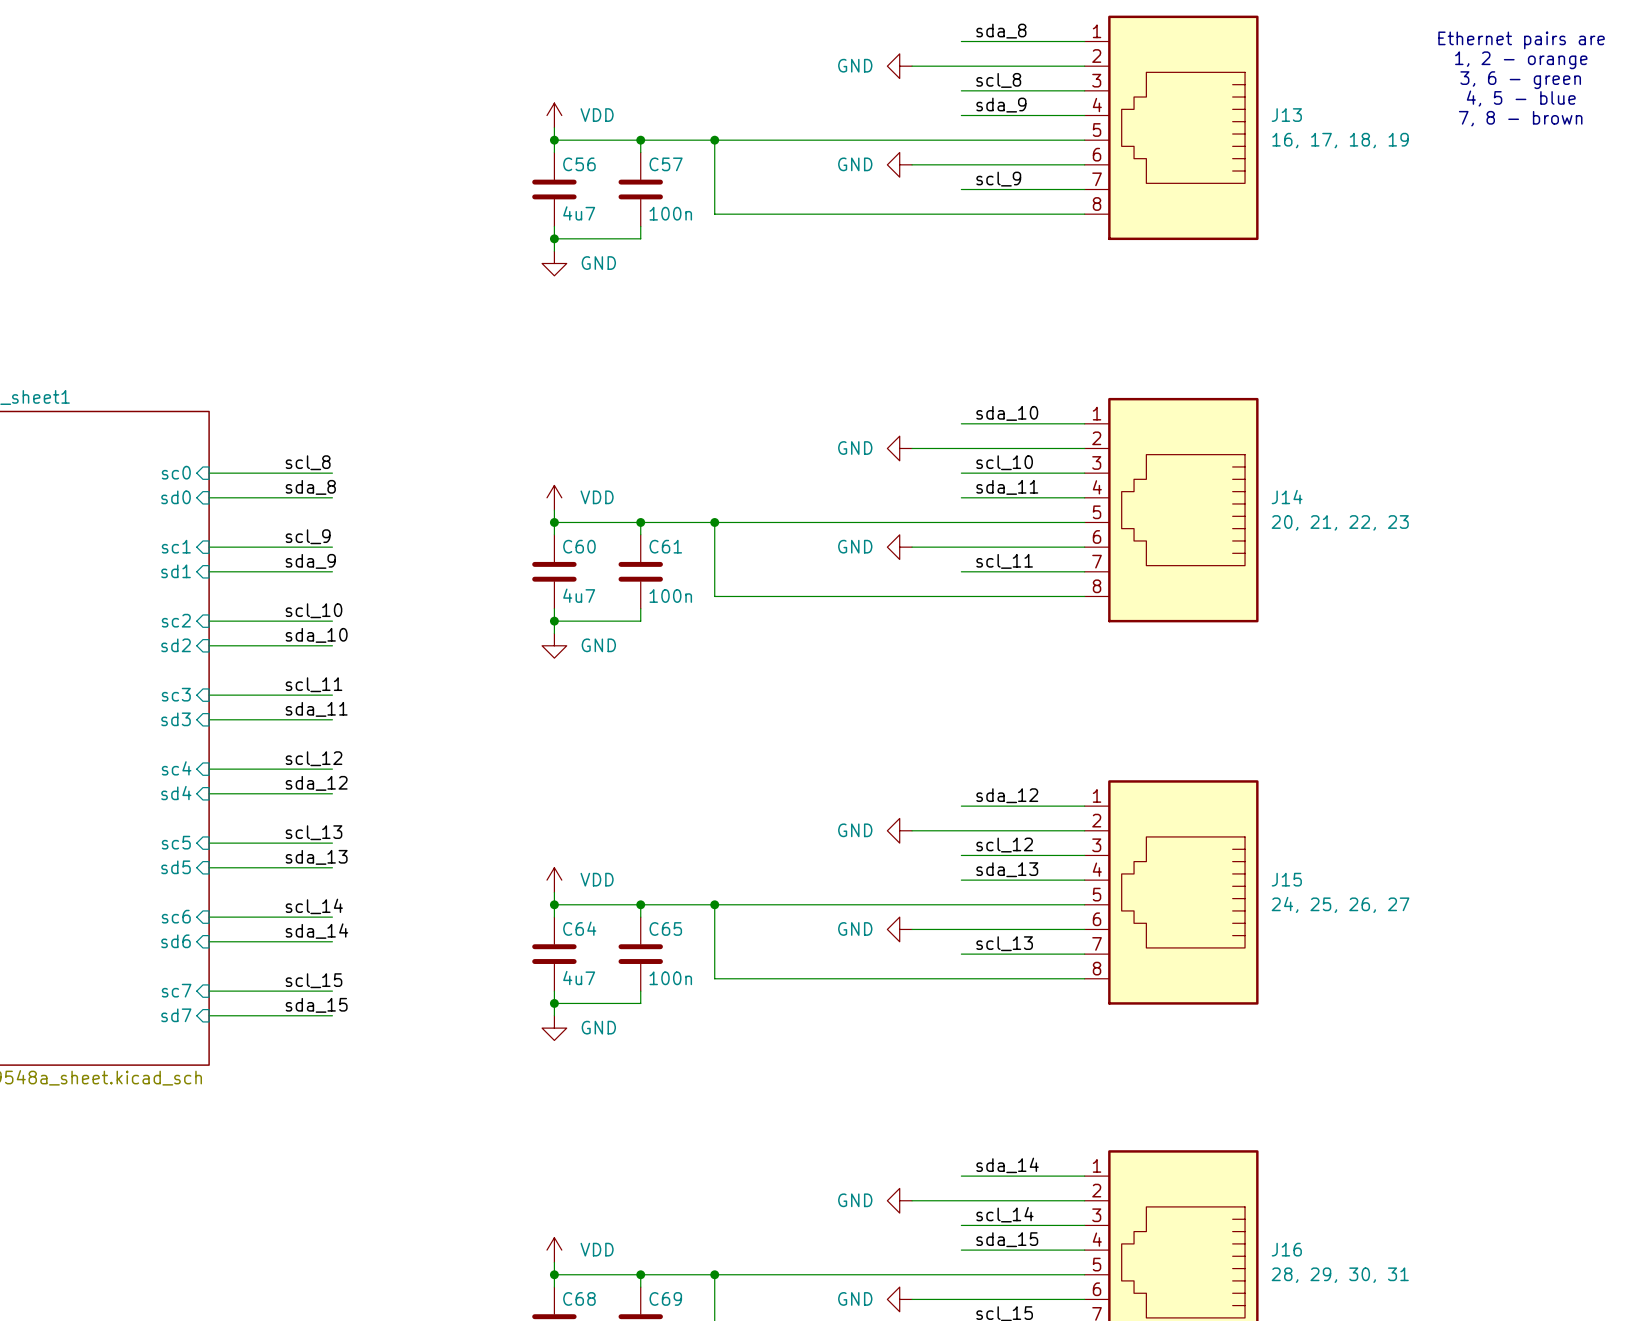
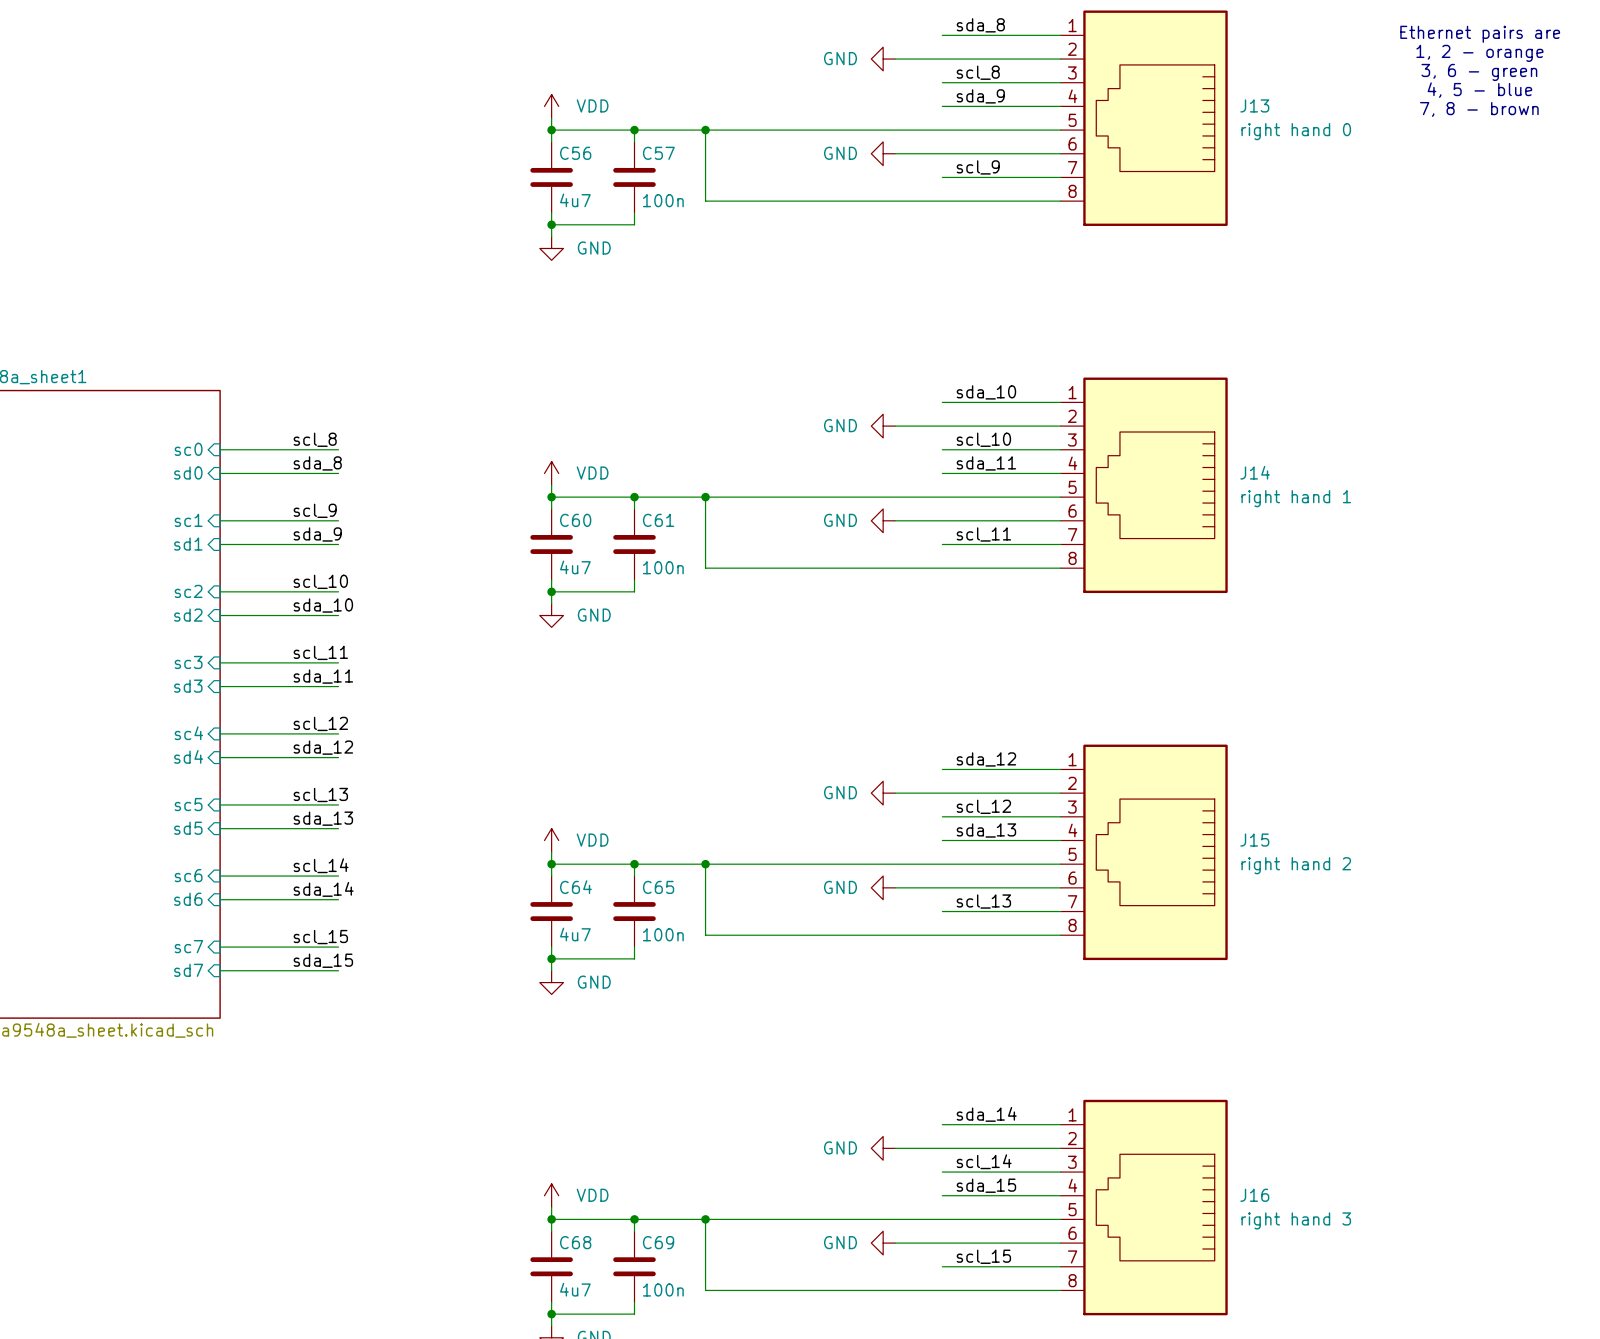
J13 value: 16, 17, 18, 19 (1340, 140) -> right hand 0 (1296, 131)
J14 value: 20, 21, 22, 23 (1340, 522) -> right hand 1 (1296, 498)
J15 value: 24, 25, 26, 27 (1340, 904) -> right hand 2 (1296, 865)
J16 value: 28, 29, 30, 31 (1340, 1275) -> right hand 3 (1296, 1220)

